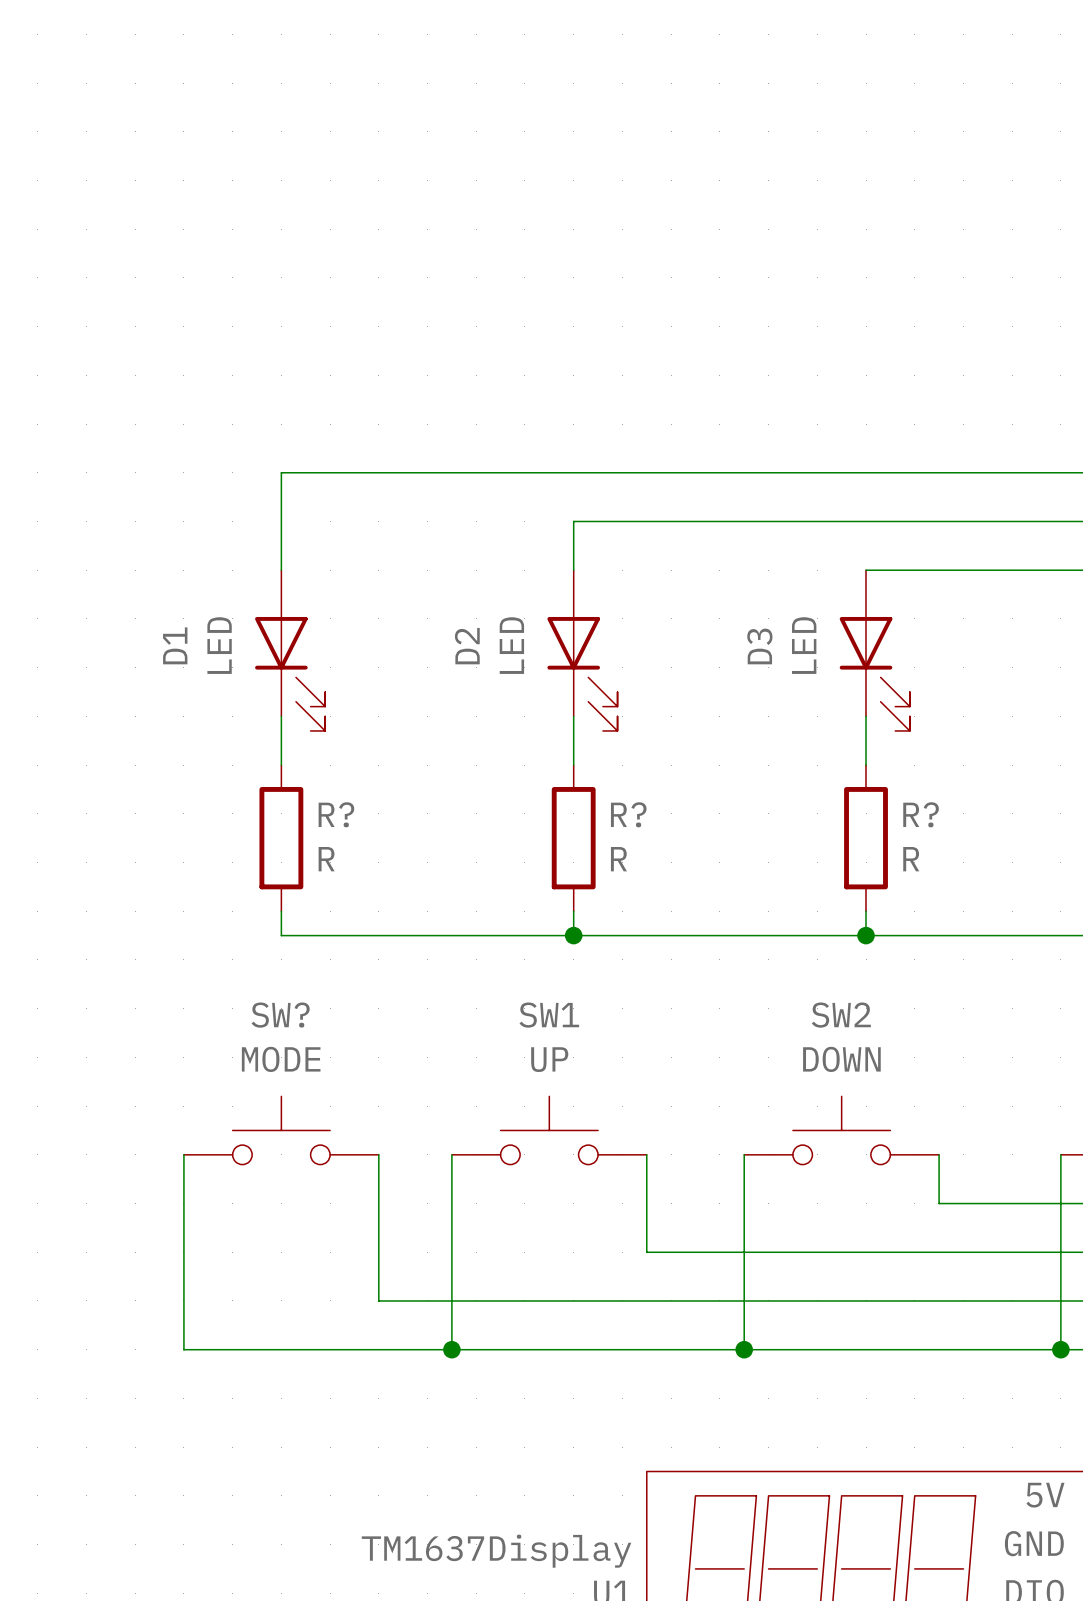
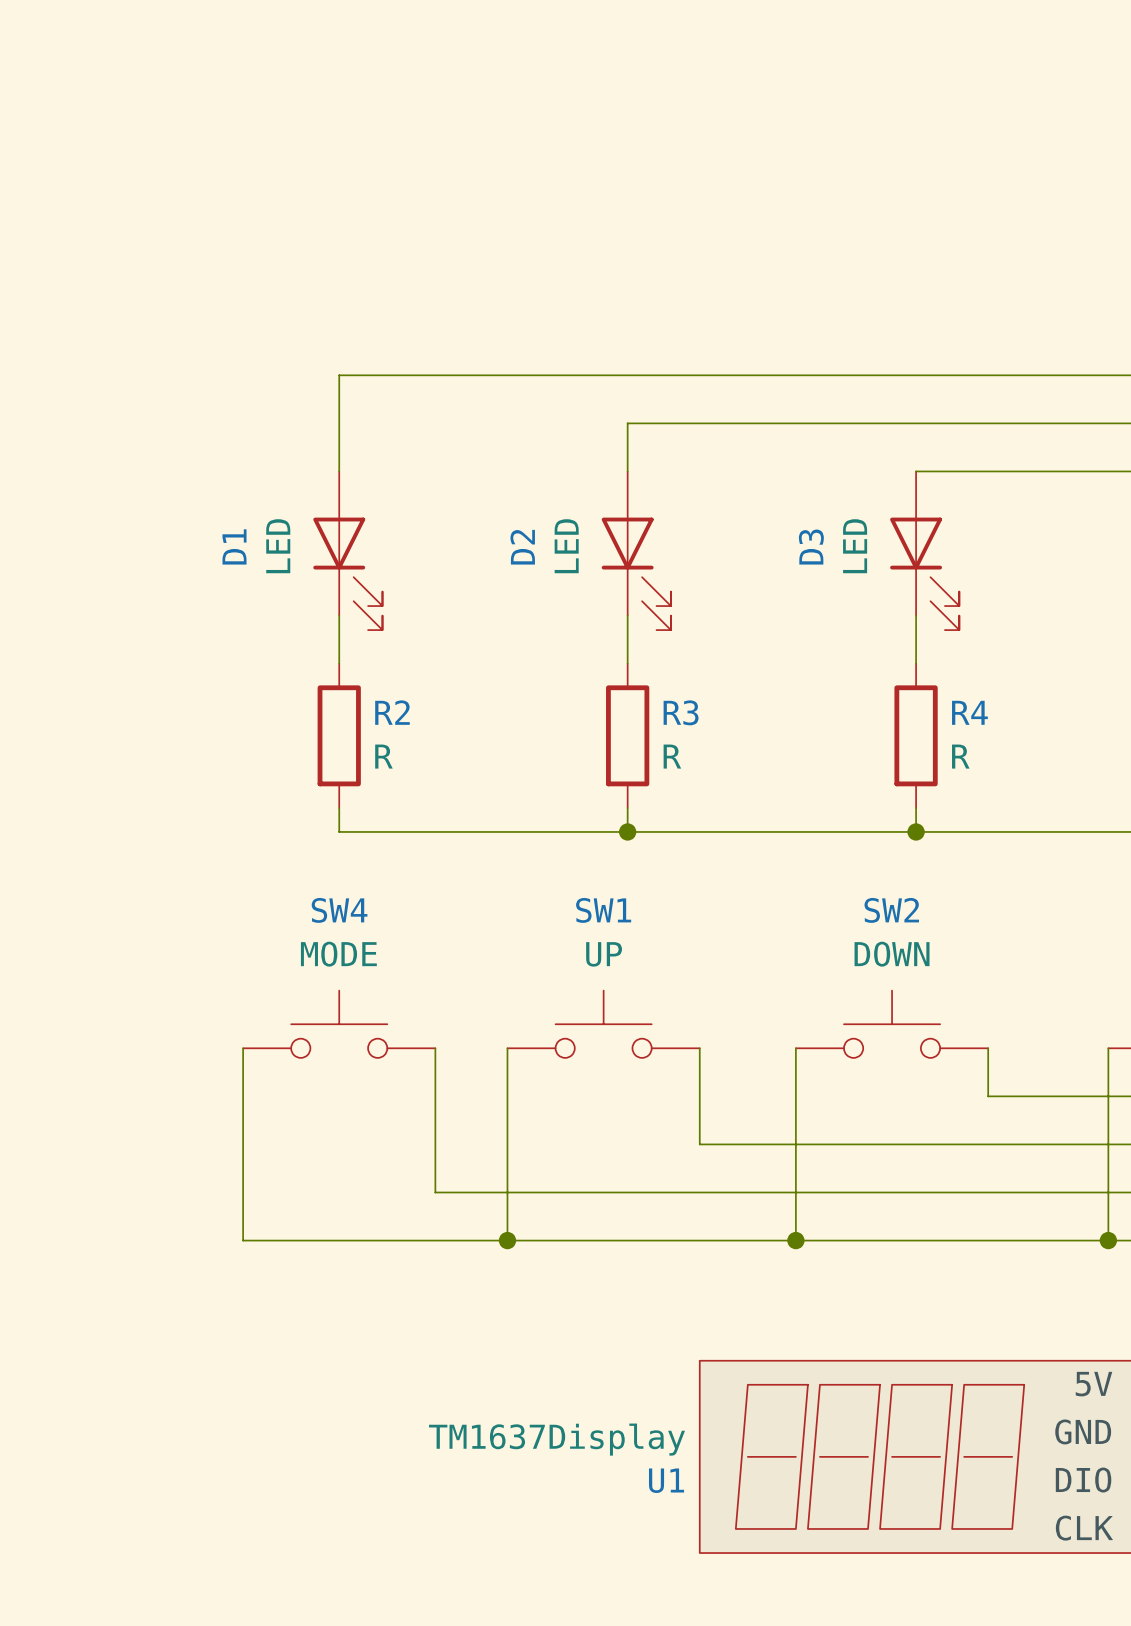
R? name: R? (336, 814) -> R2 (392, 712)
R? name: R? (628, 814) -> R3 (681, 712)
R? name: R? (921, 814) -> R4 (969, 712)
SW? name: SW? (280, 1015) -> SW4 (339, 910)

